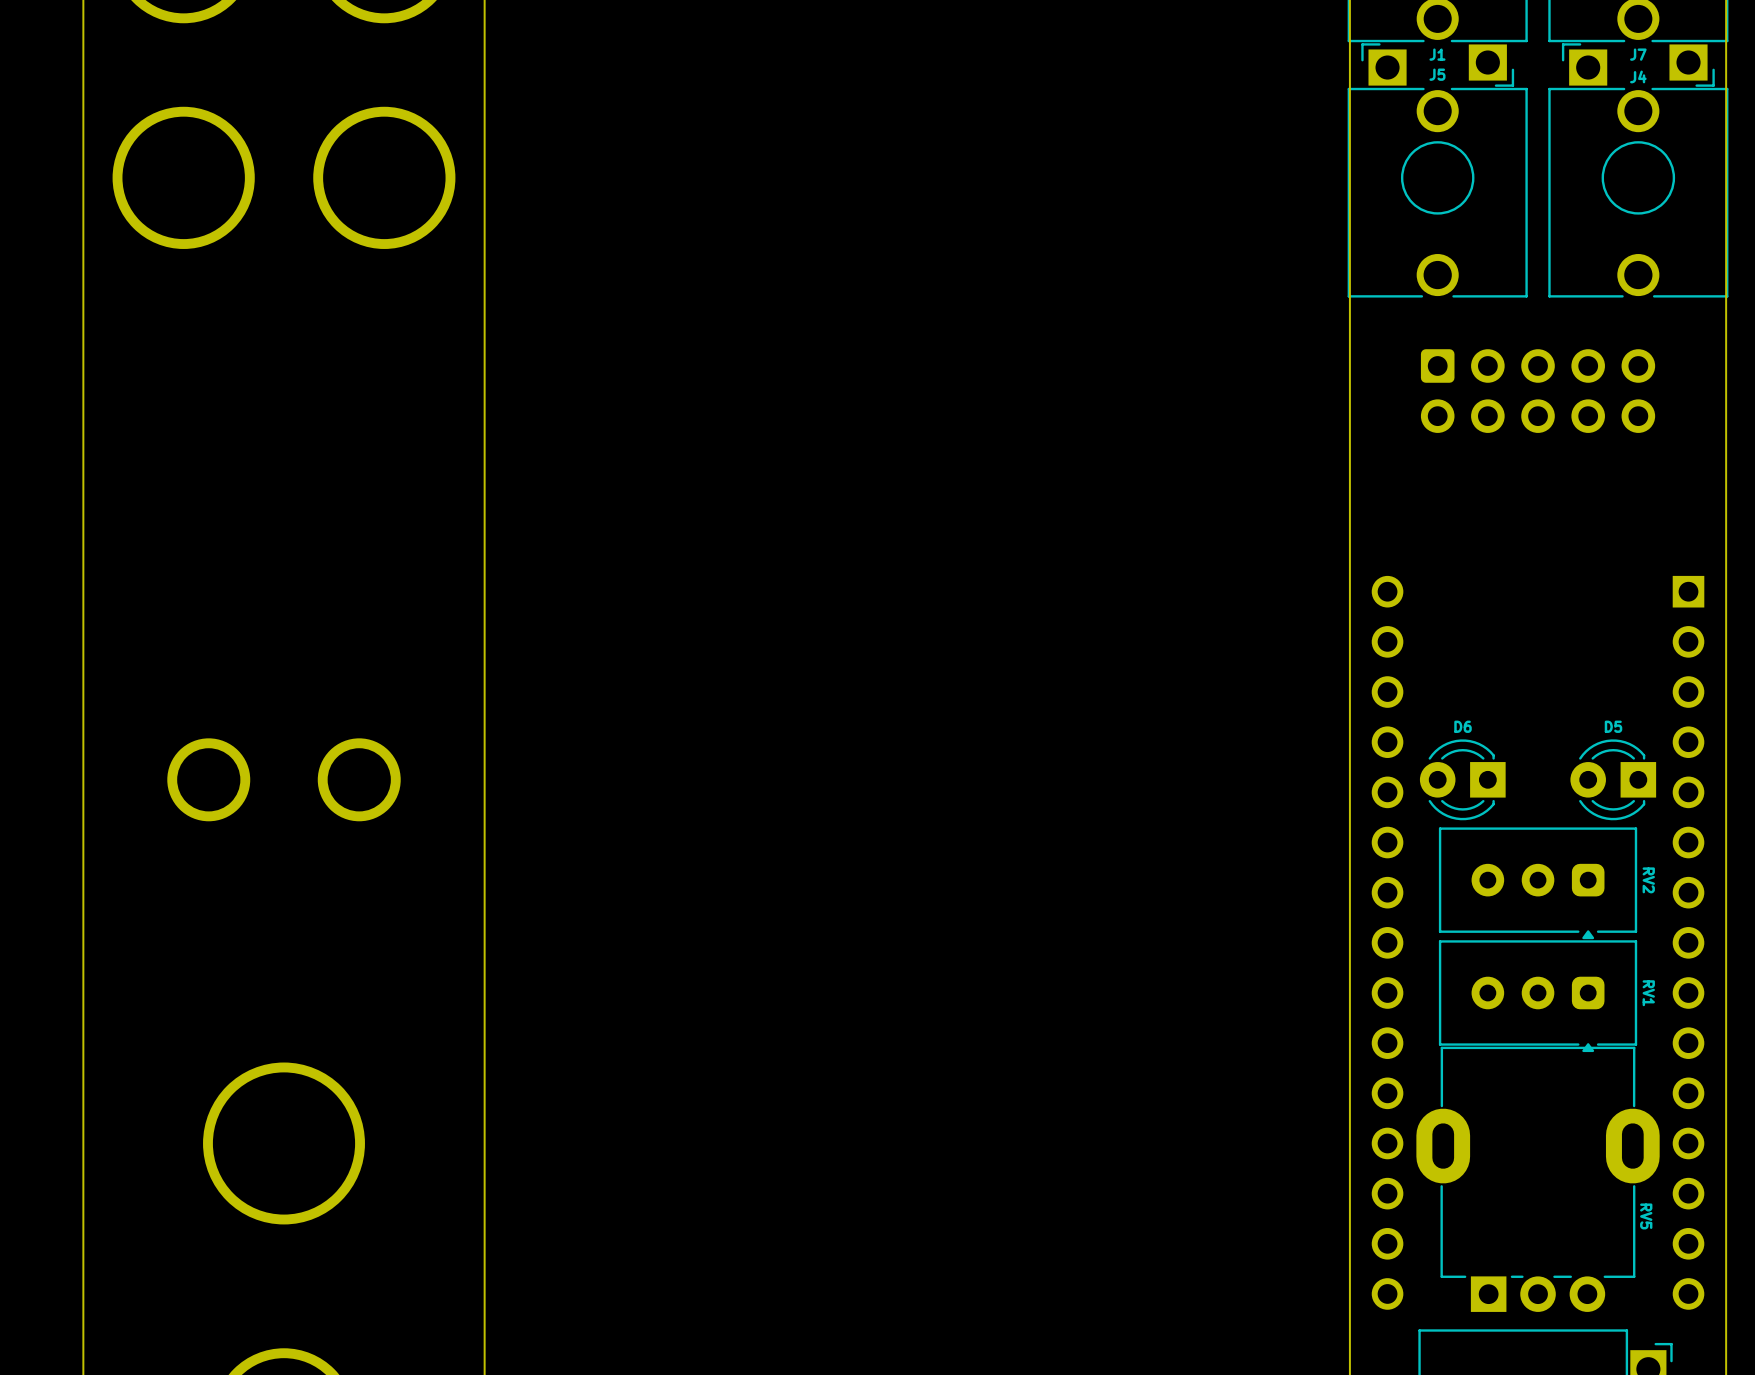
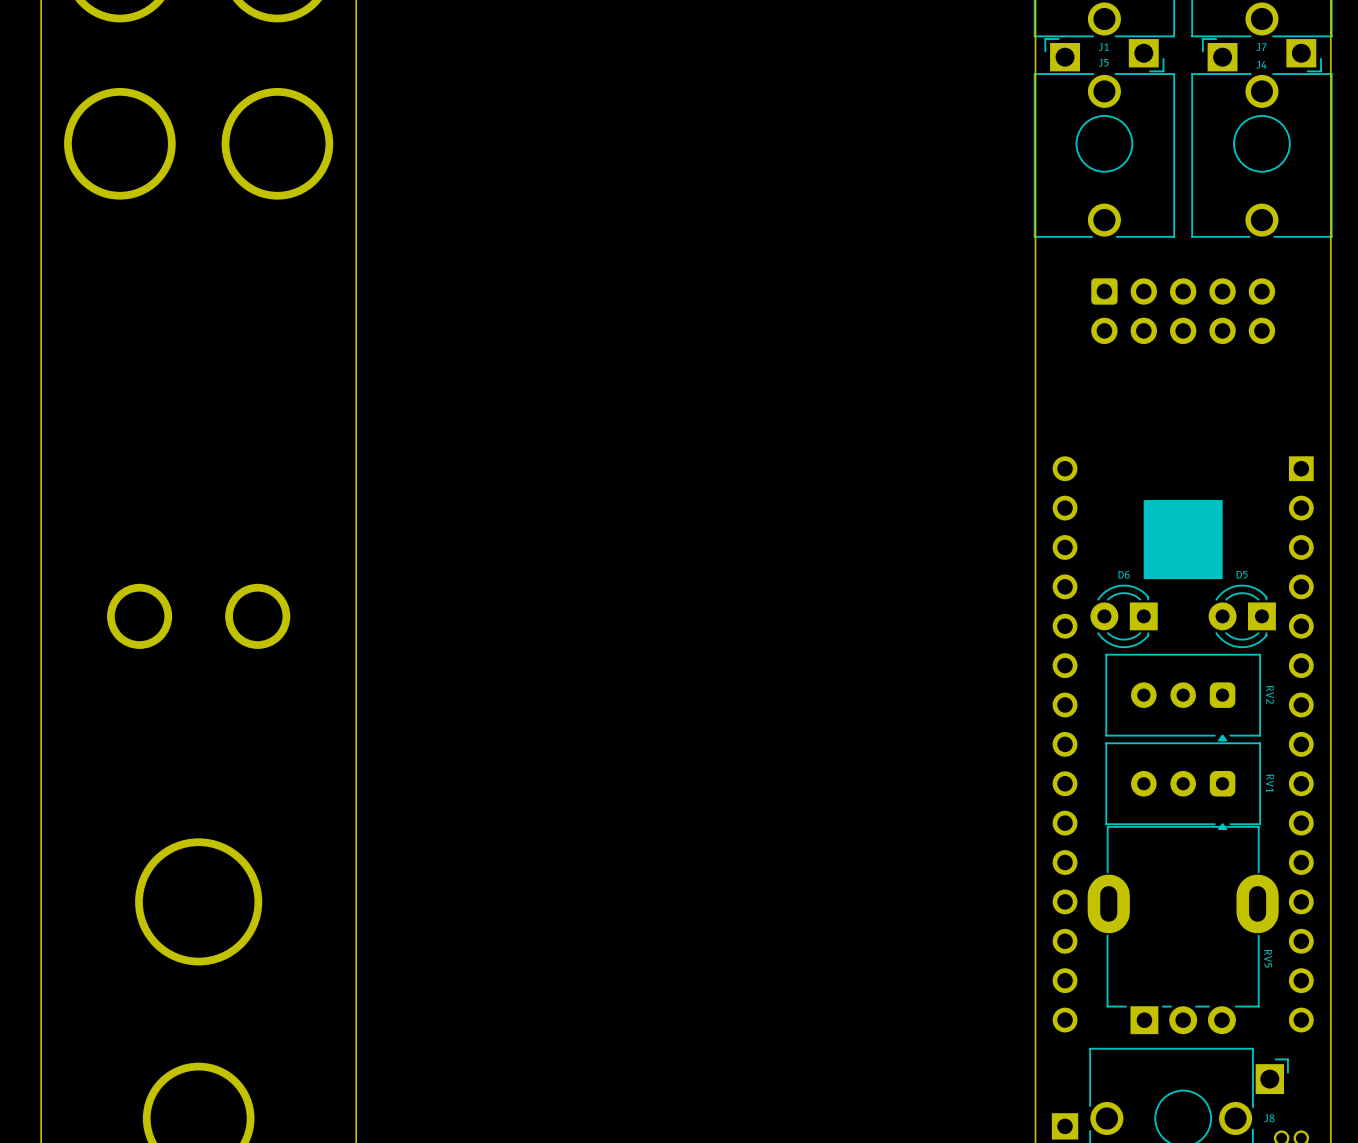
drawing: none -> [1143, 500, 1223, 580]

